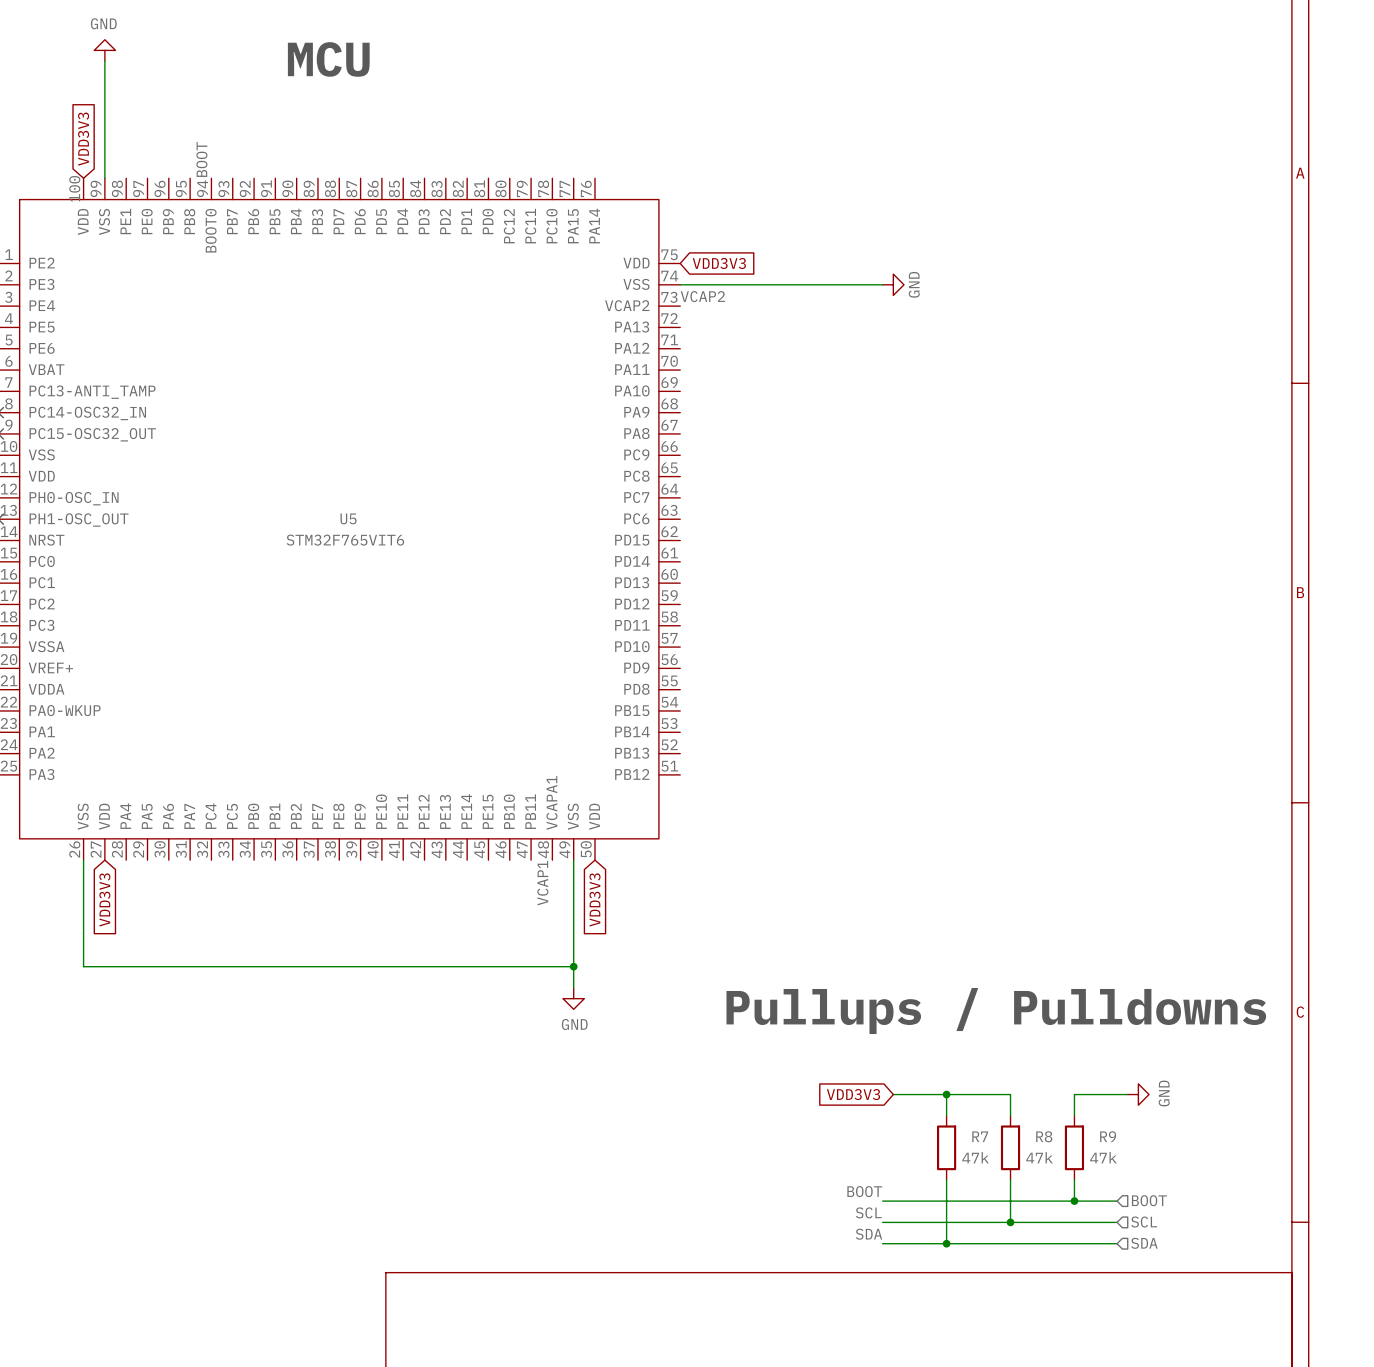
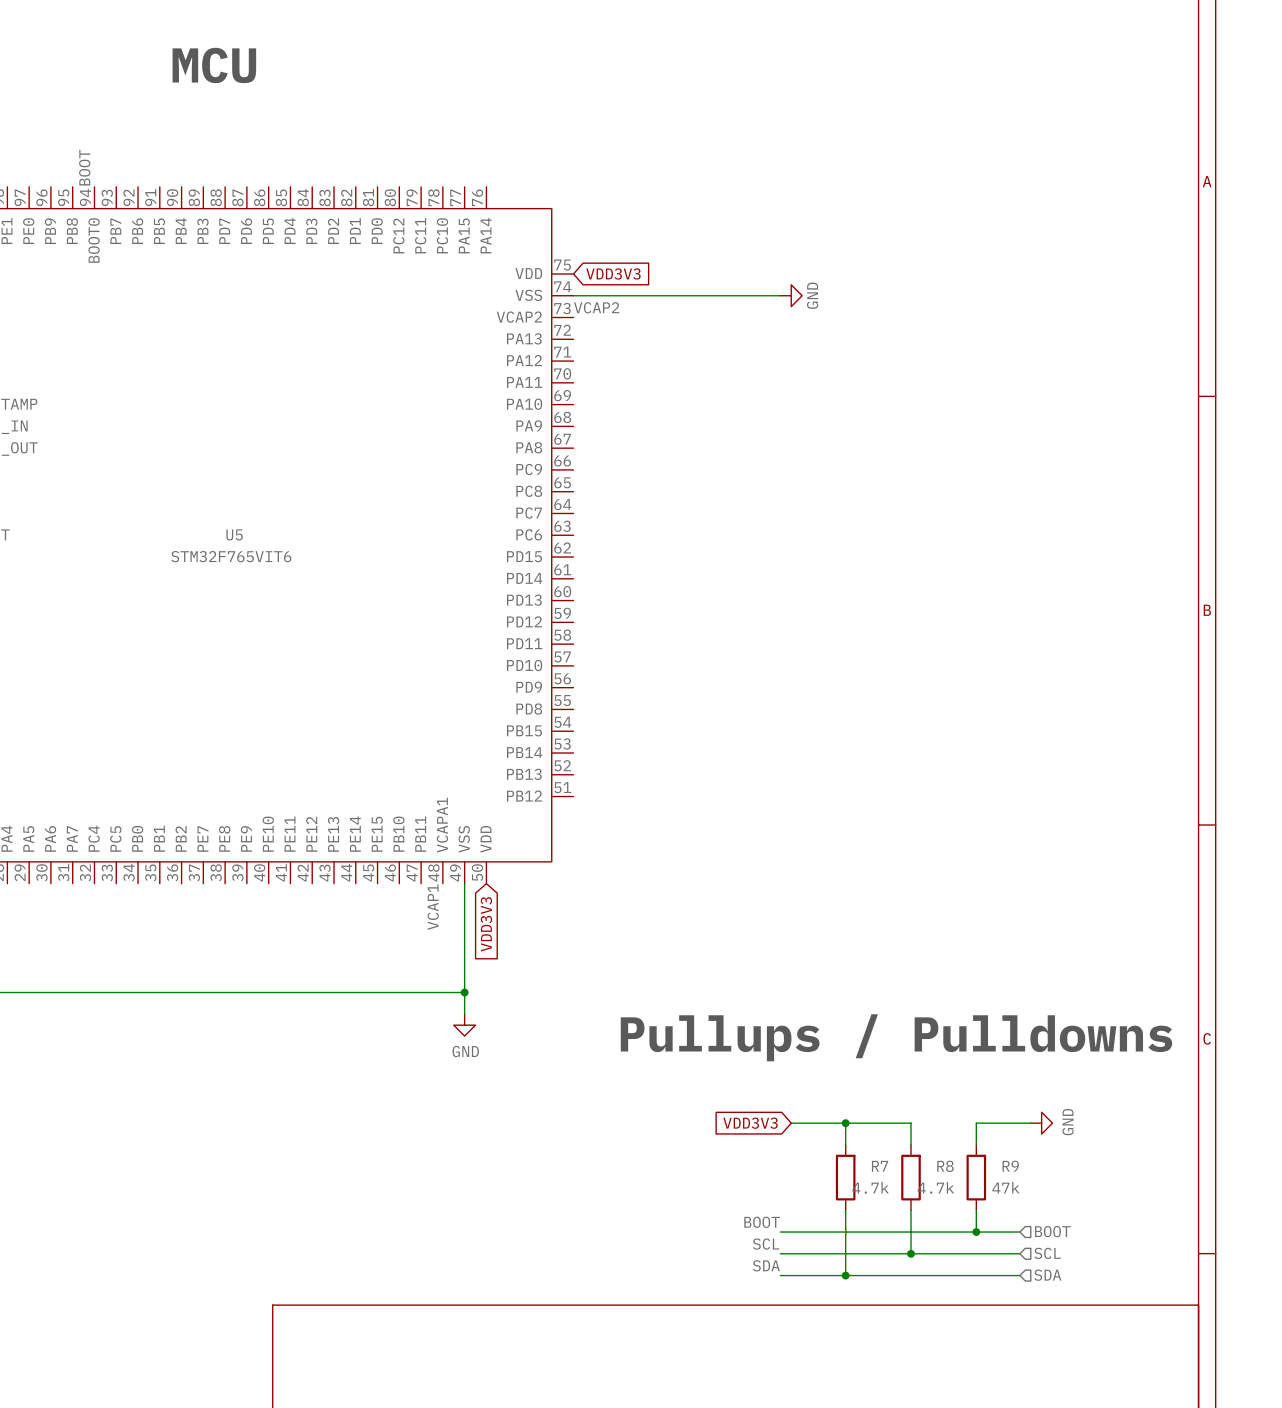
R7 value: 47k (975, 1157) -> 4.7k (870, 1187)
R8 value: 47k (1039, 1157) -> 4.7k (935, 1187)

